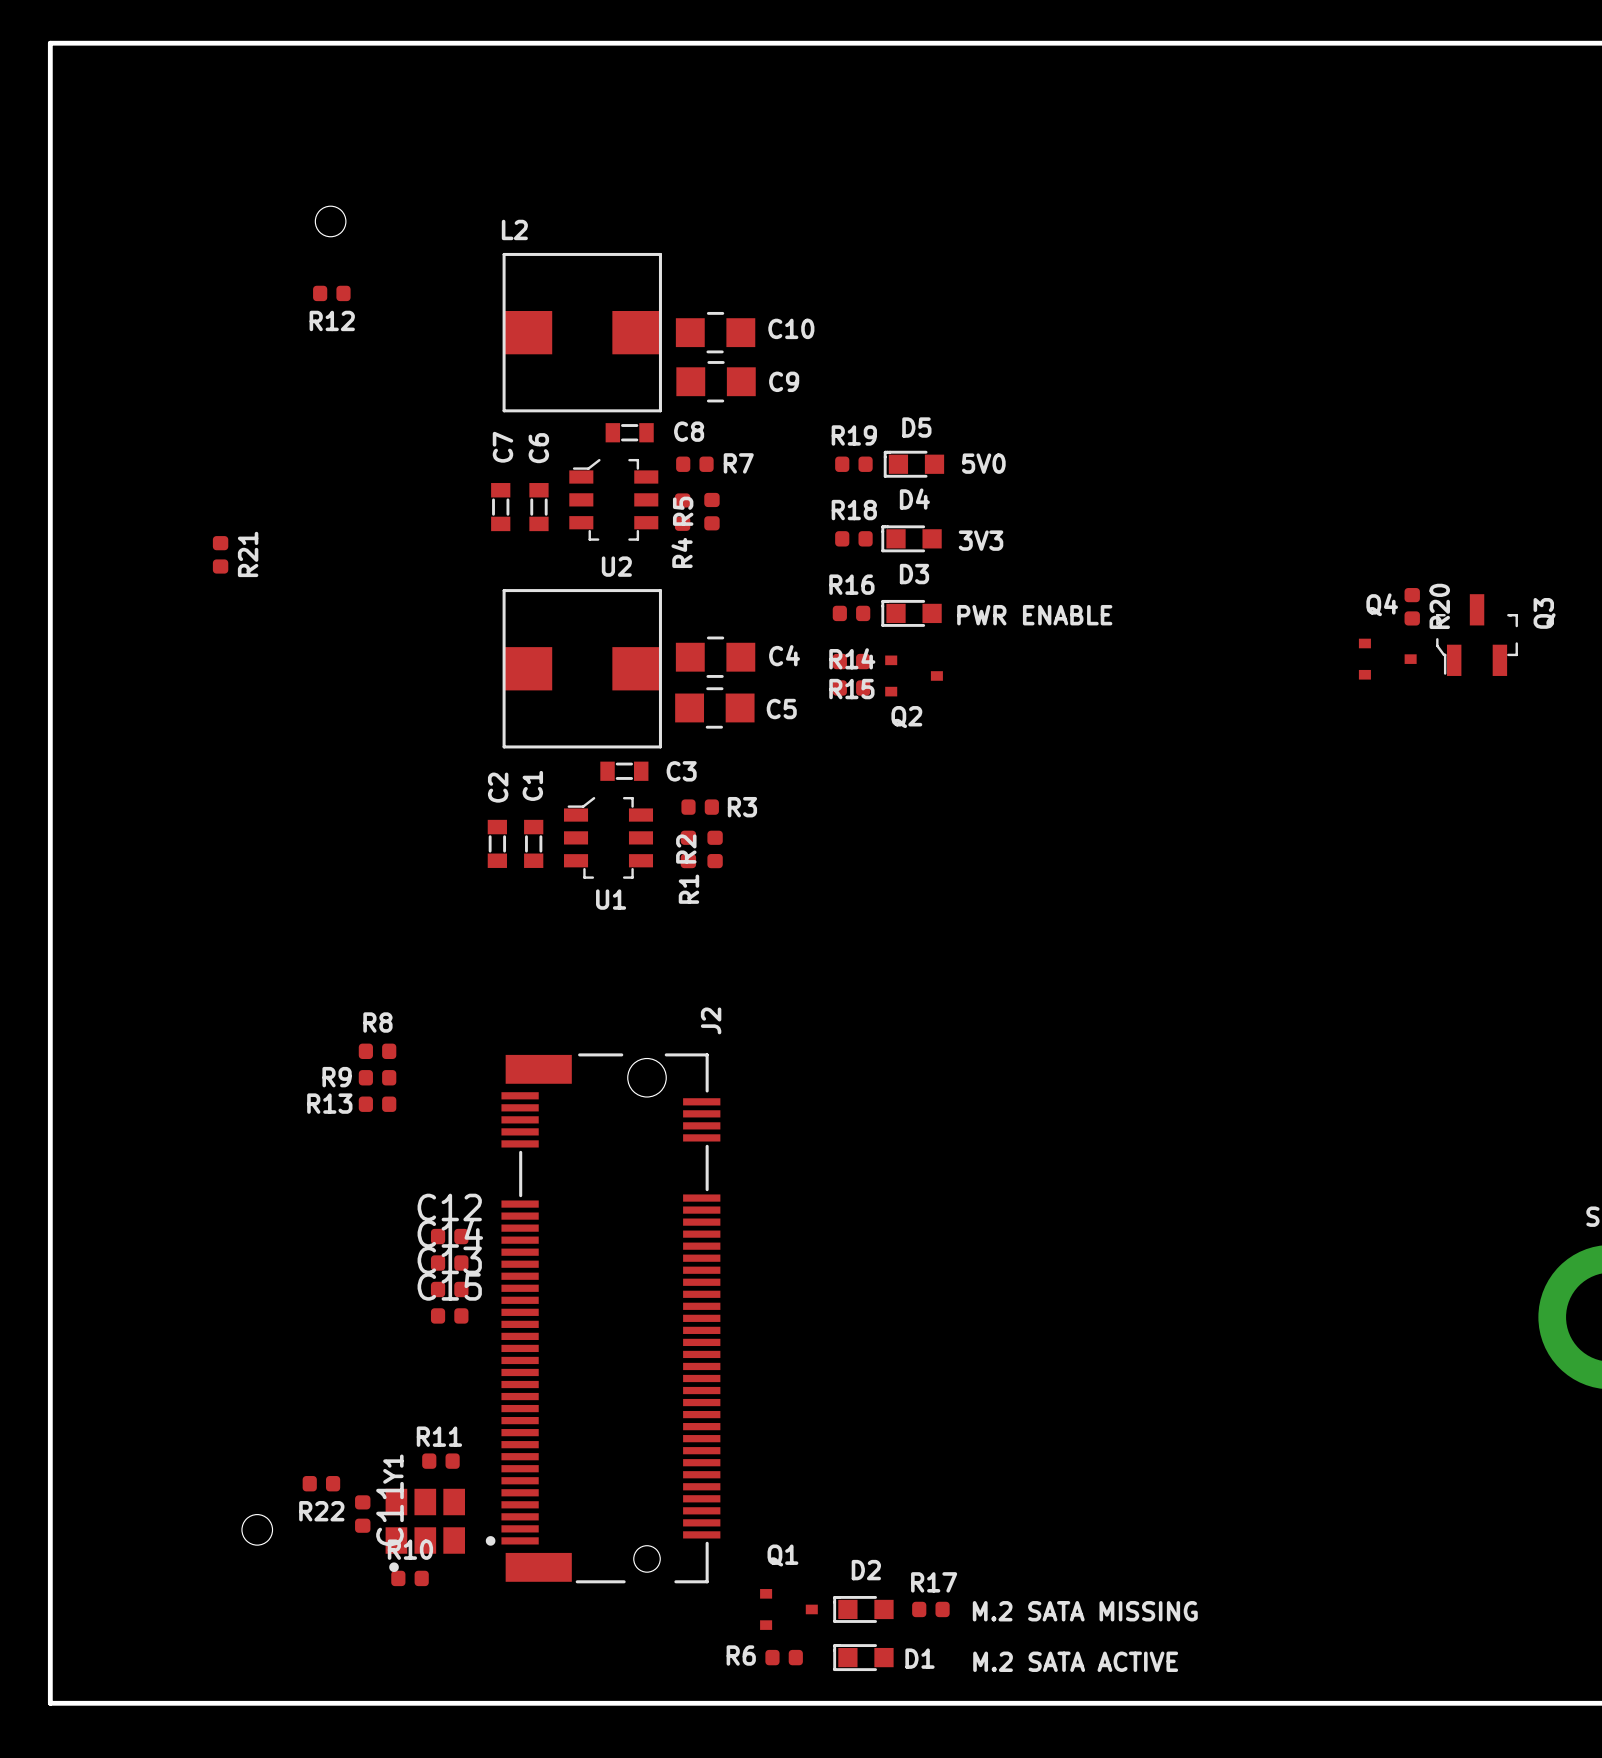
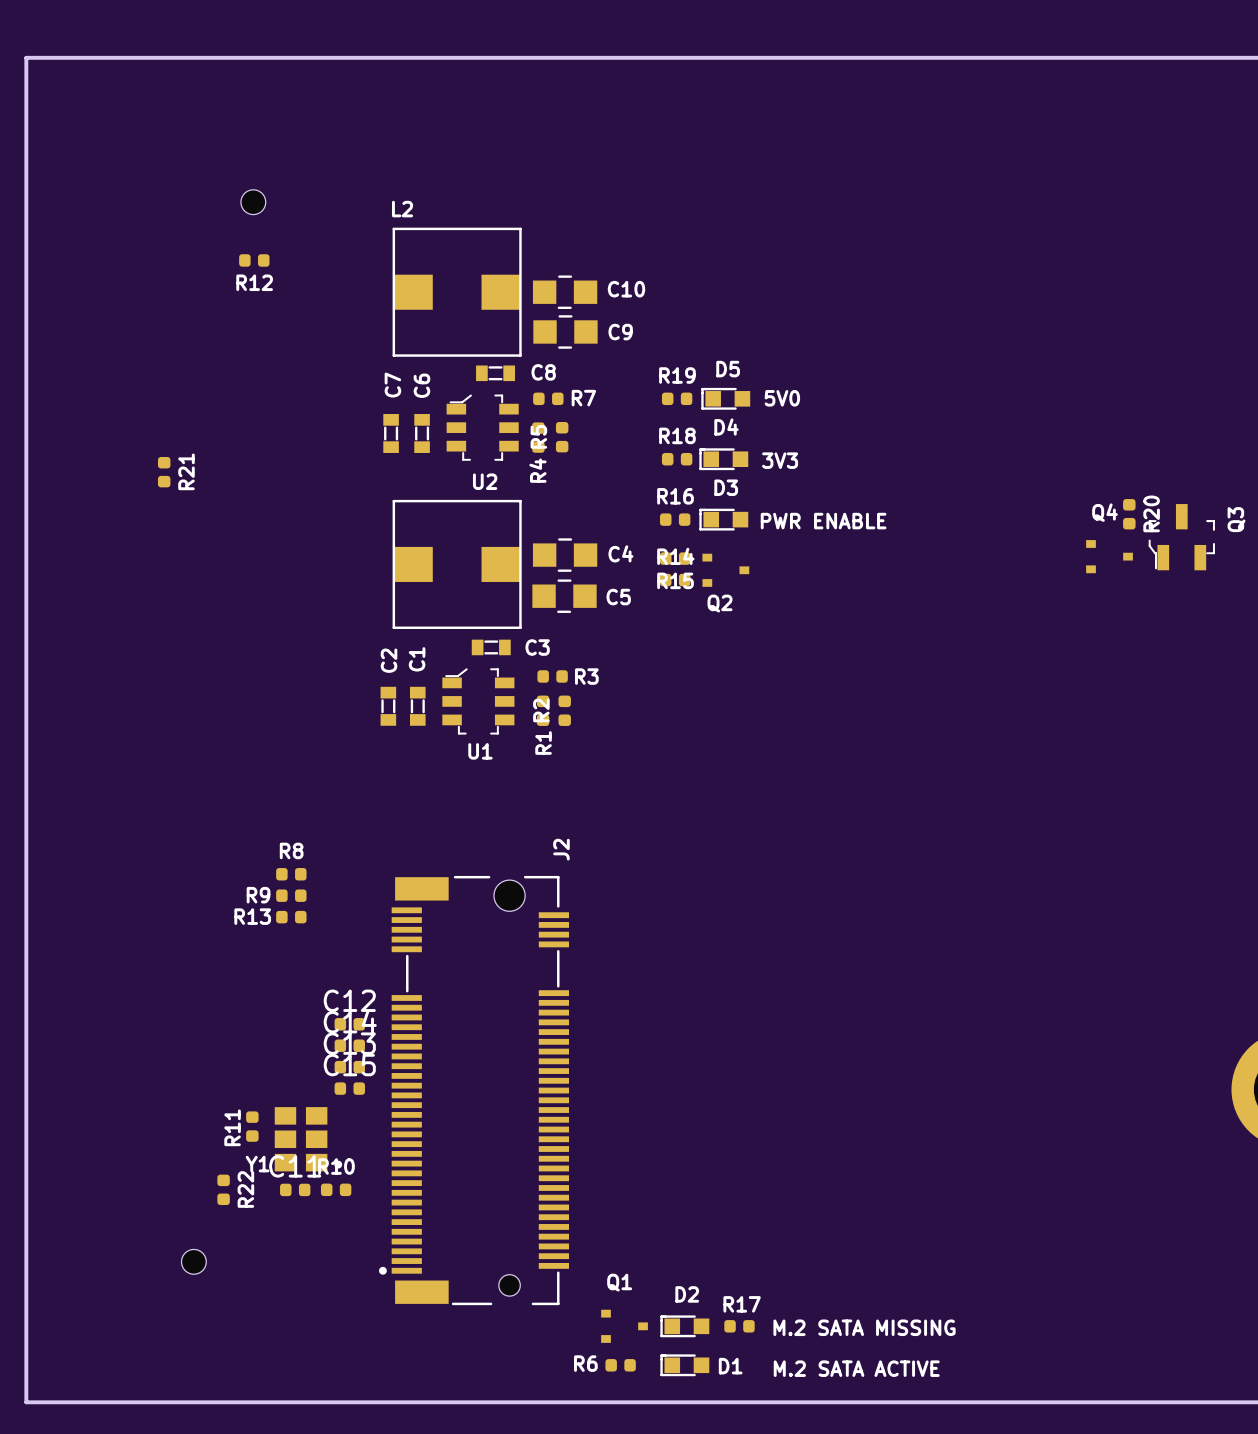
R11 rotation: 0° (440, 1461) -> 90° clockwise (252, 1126)
R11 position: (440, 1461) -> (252, 1126)
R22 rotation: 0° (321, 1483) -> 90° clockwise (223, 1189)
R22 position: (321, 1483) -> (223, 1189)
C11 rotation: 0° (362, 1514) -> 90° clockwise (295, 1189)
C11 position: (362, 1514) -> (295, 1189)
Y1 rotation: 0° (425, 1530) -> 90° counterclockwise (308, 1139)
Y1 position: (425, 1530) -> (308, 1139)
R10 position: (410, 1578) -> (336, 1189)

